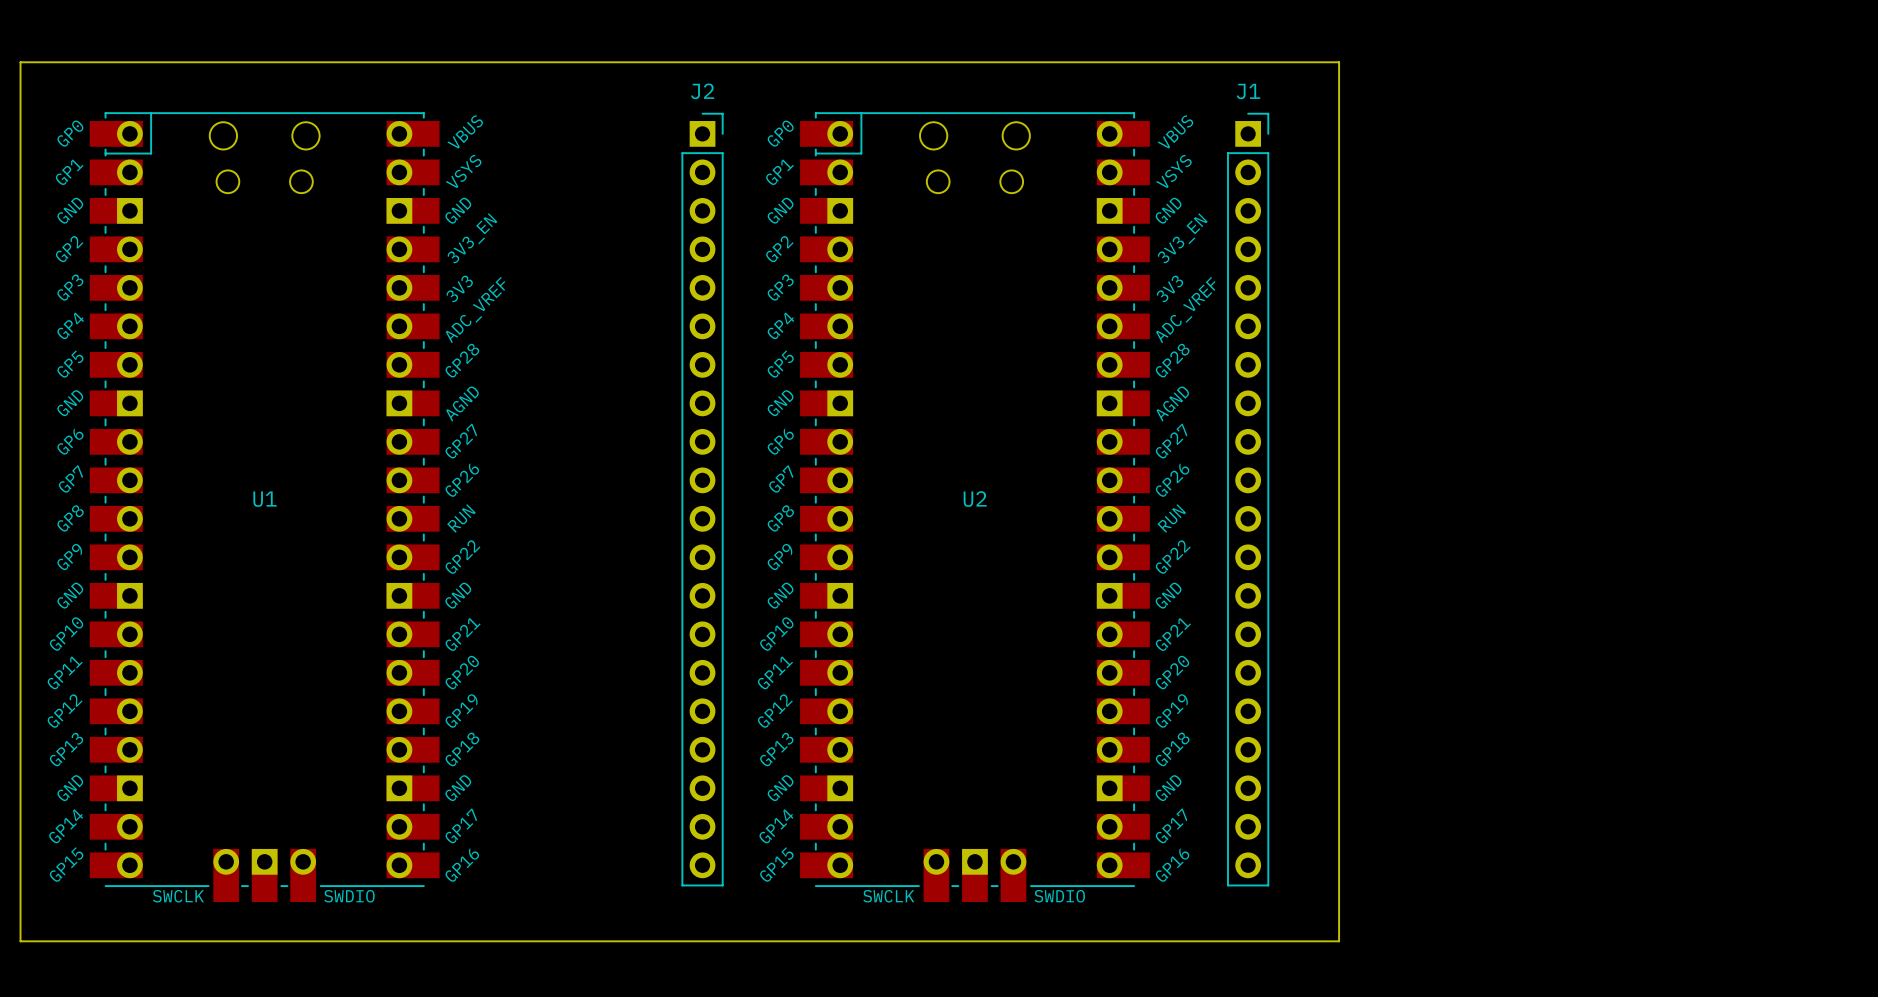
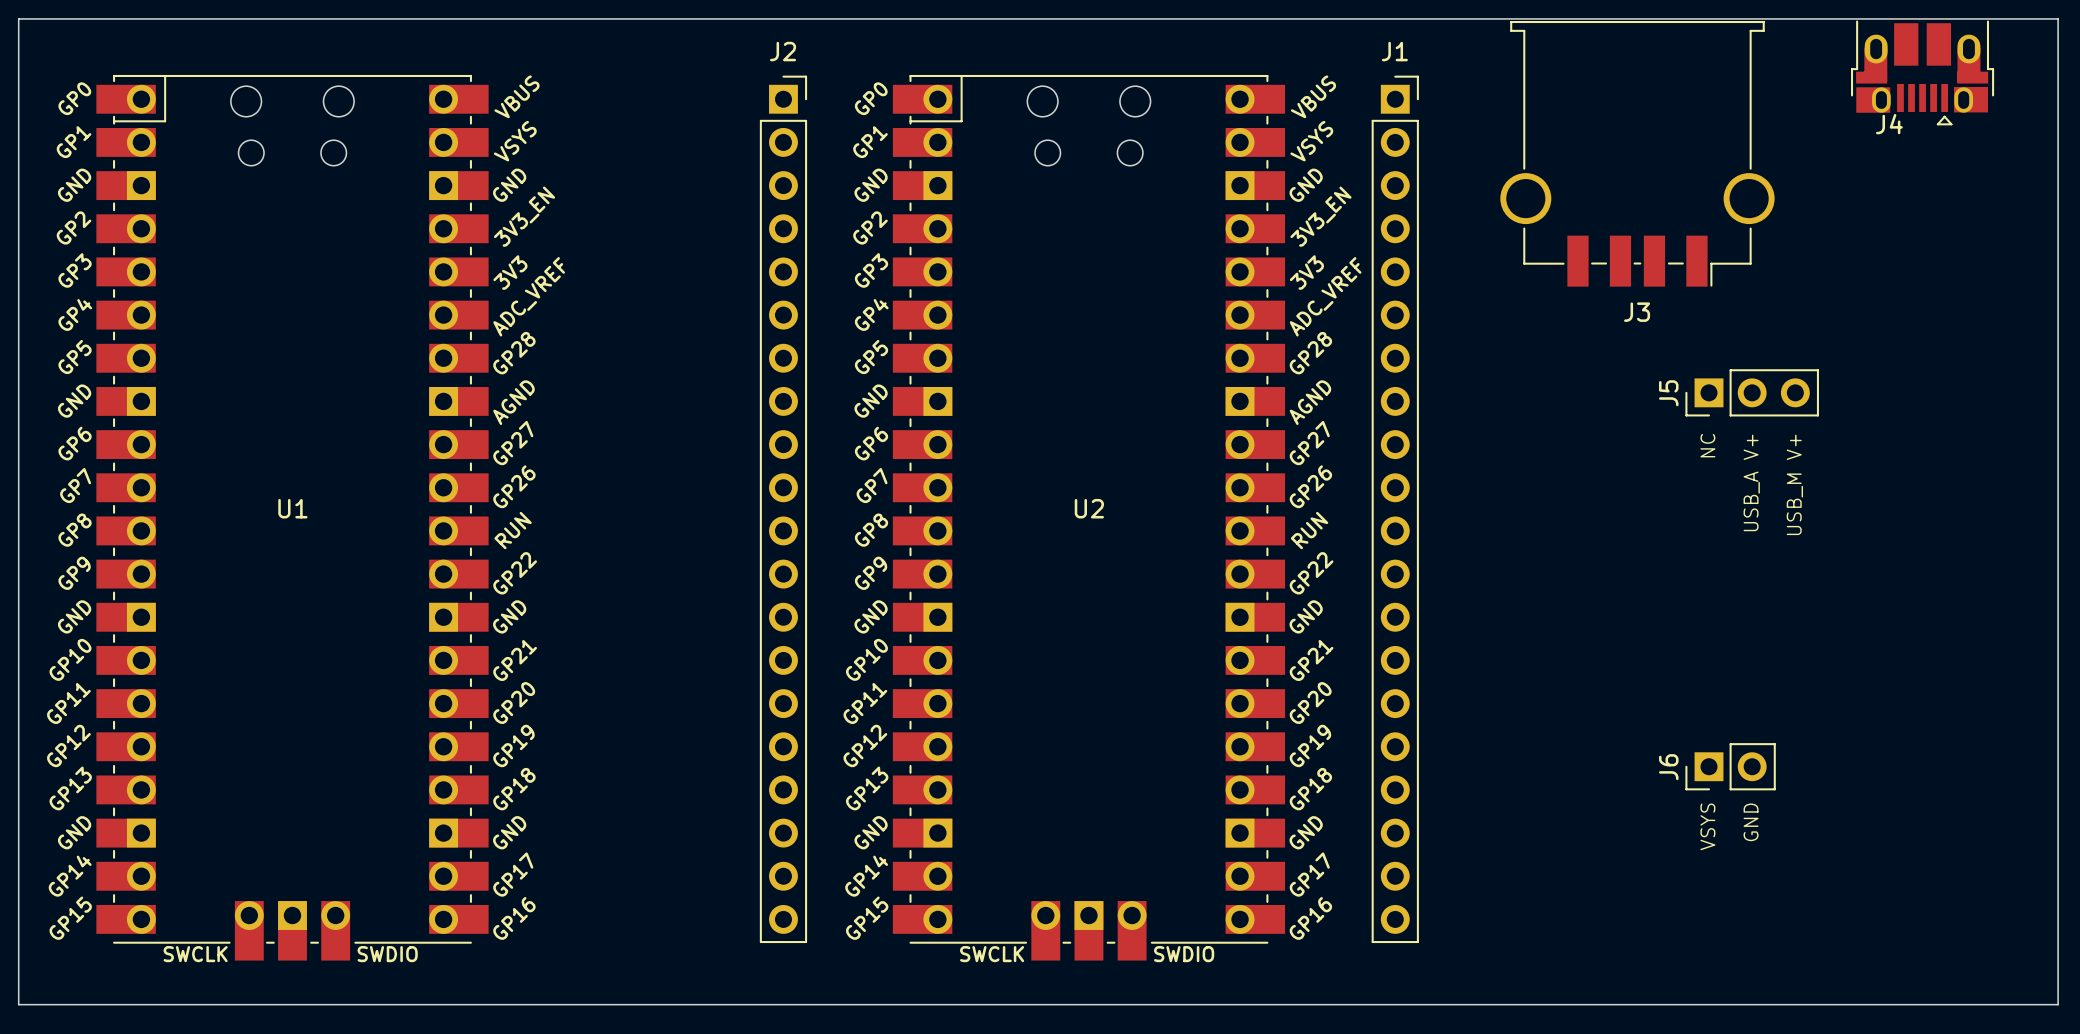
board edge: (1339, 62) (1339, 941) -> (1497, 18) (2058, 18) (2058, 1004) (1497, 1004)
J4: none -> (1922, 72)
J3: none -> (1637, 153)
J5: none -> (1752, 392)
text: none -> NC (1707, 445)
text: none -> USB_A V+ (1751, 482)
text: none -> USB_M V+ (1794, 484)
J6: none -> (1730, 766)
text: none -> GND (1751, 822)
text: none -> VSYS (1707, 826)

